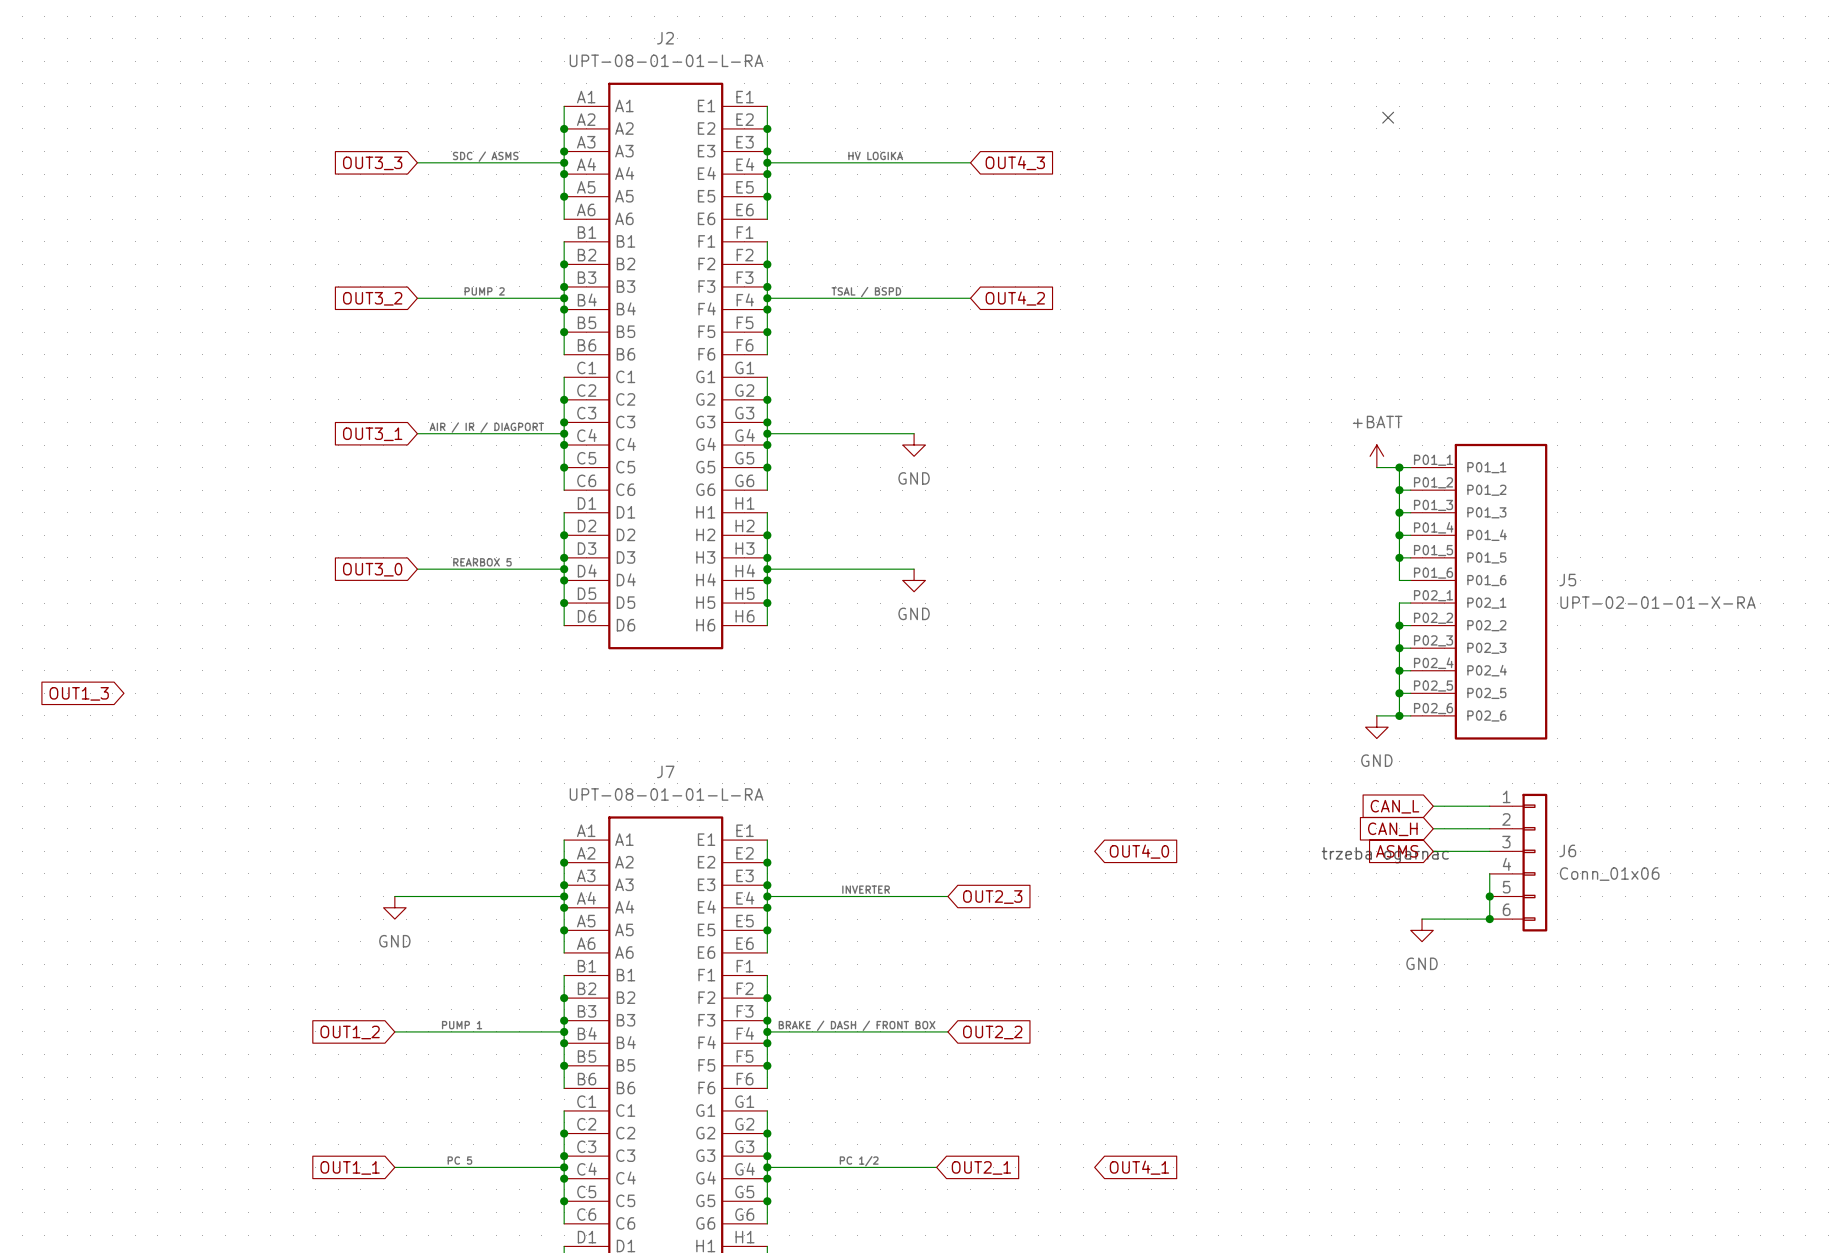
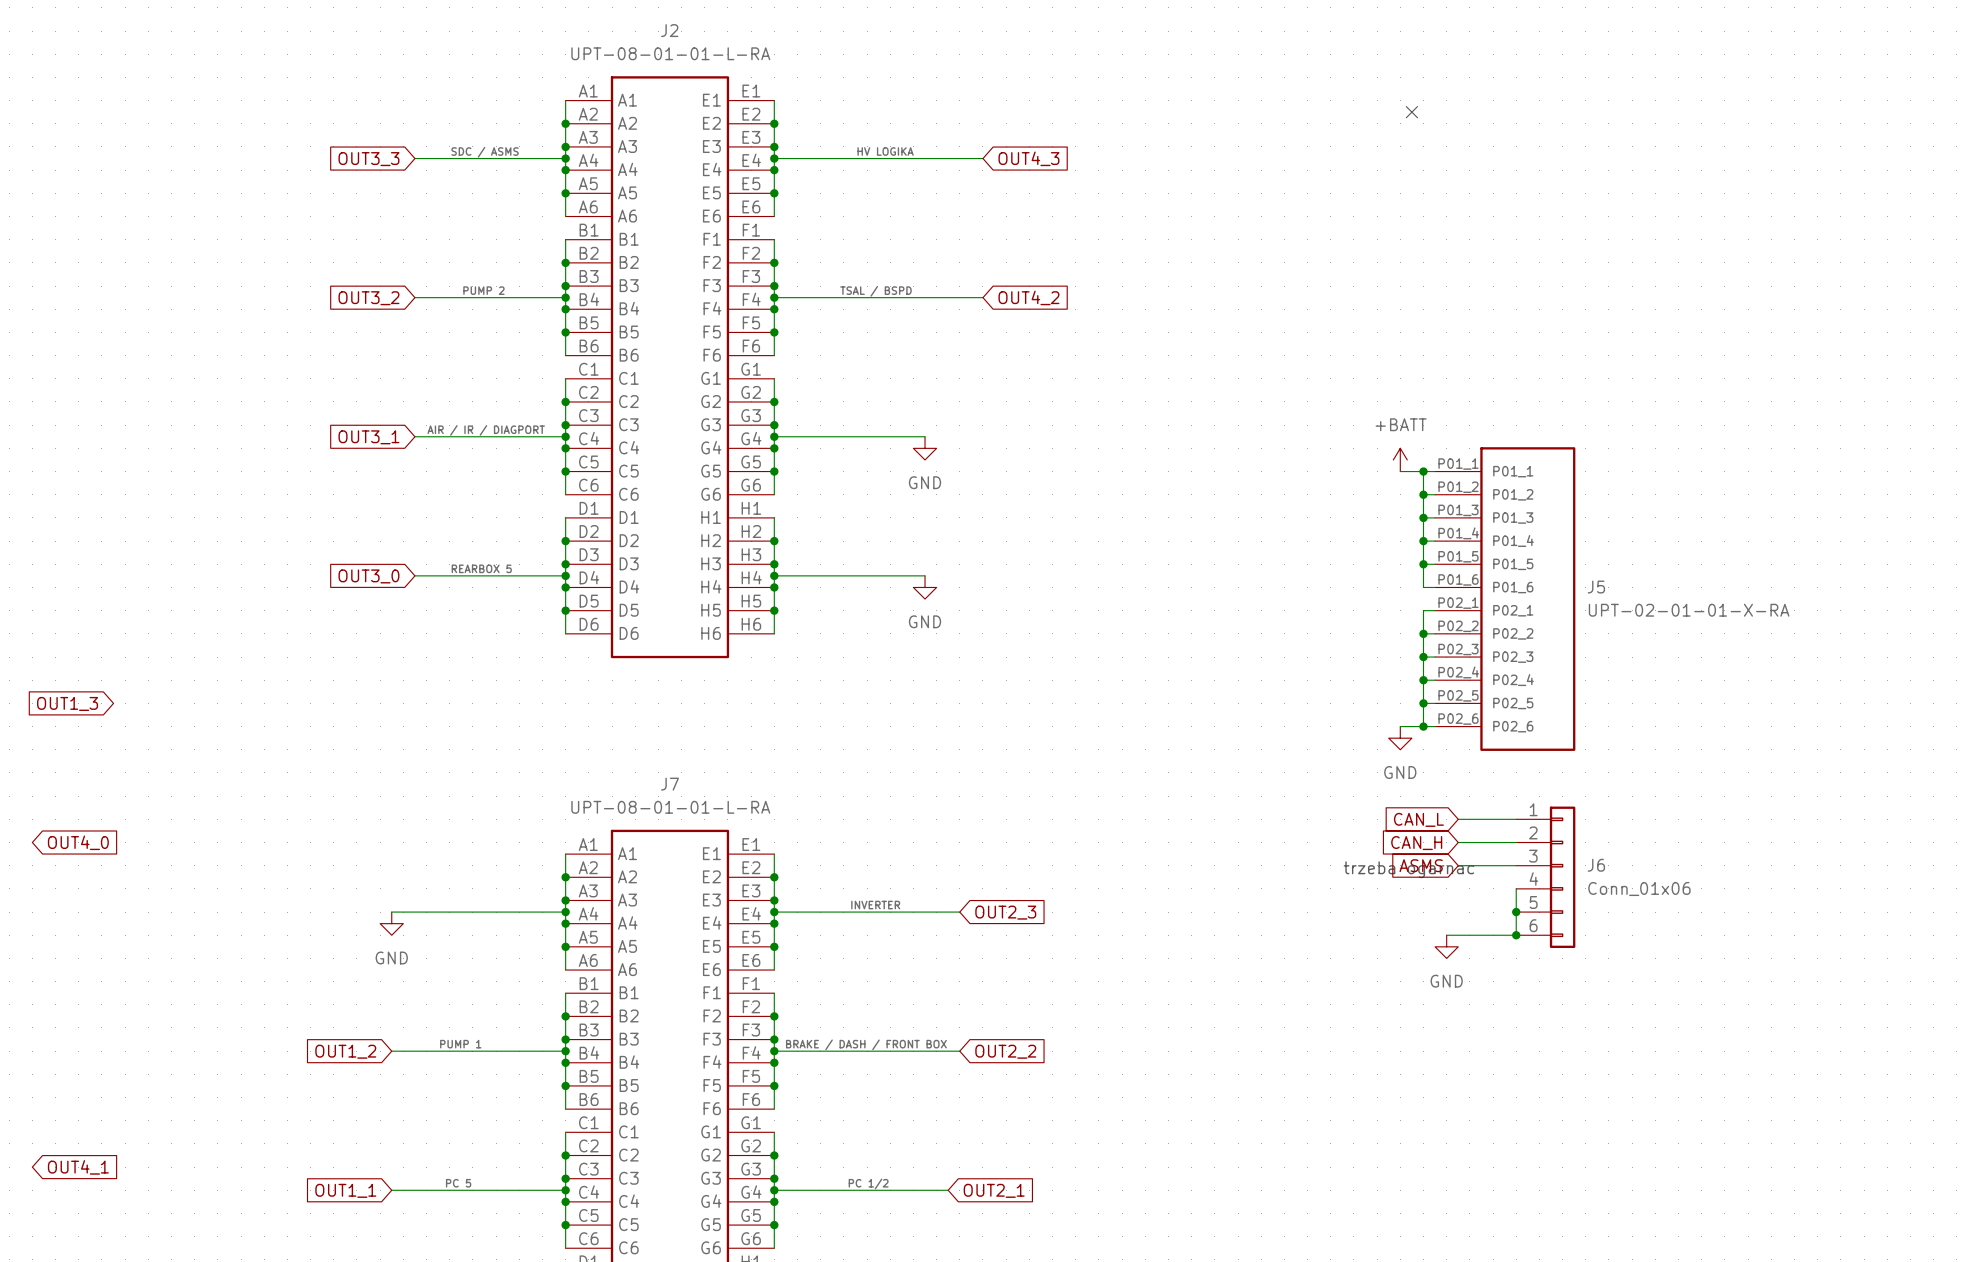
global label: none -> OUT4_0 (78, 842)
global label: OUT4_0 (1139, 851) -> none
global label: none -> OUT4_1 (78, 1167)
global label: OUT4_1 (1139, 1167) -> none

